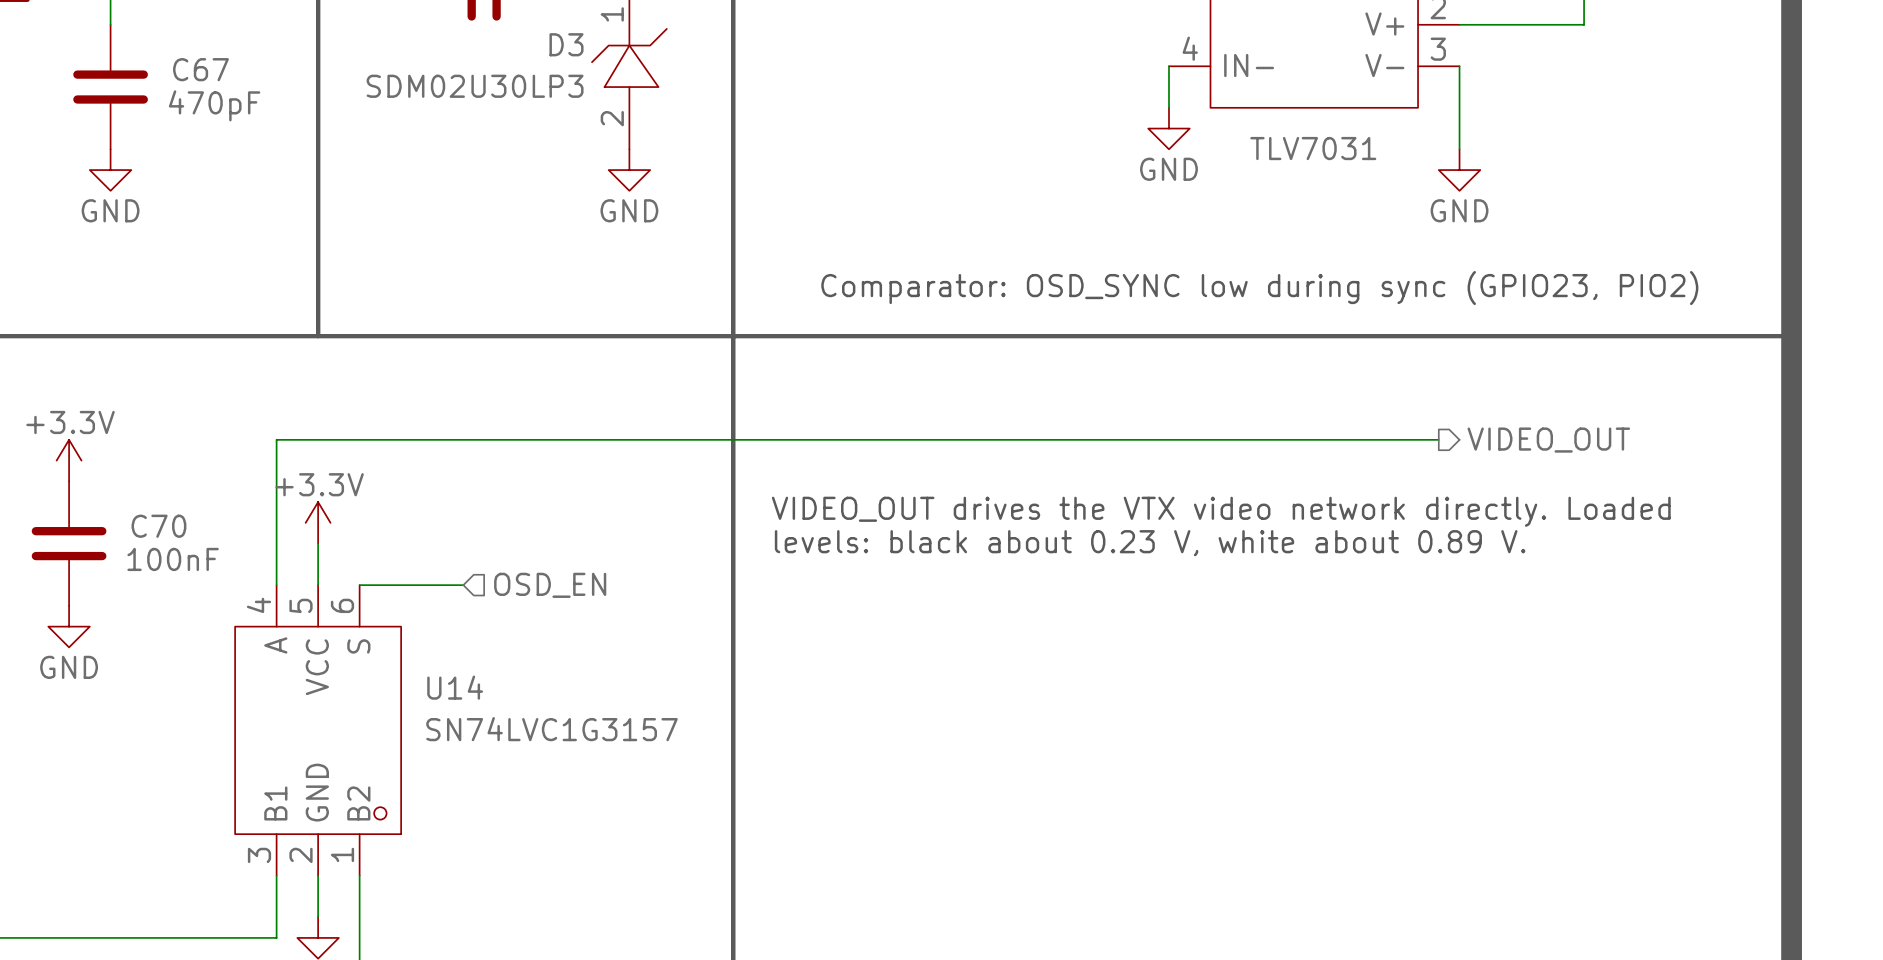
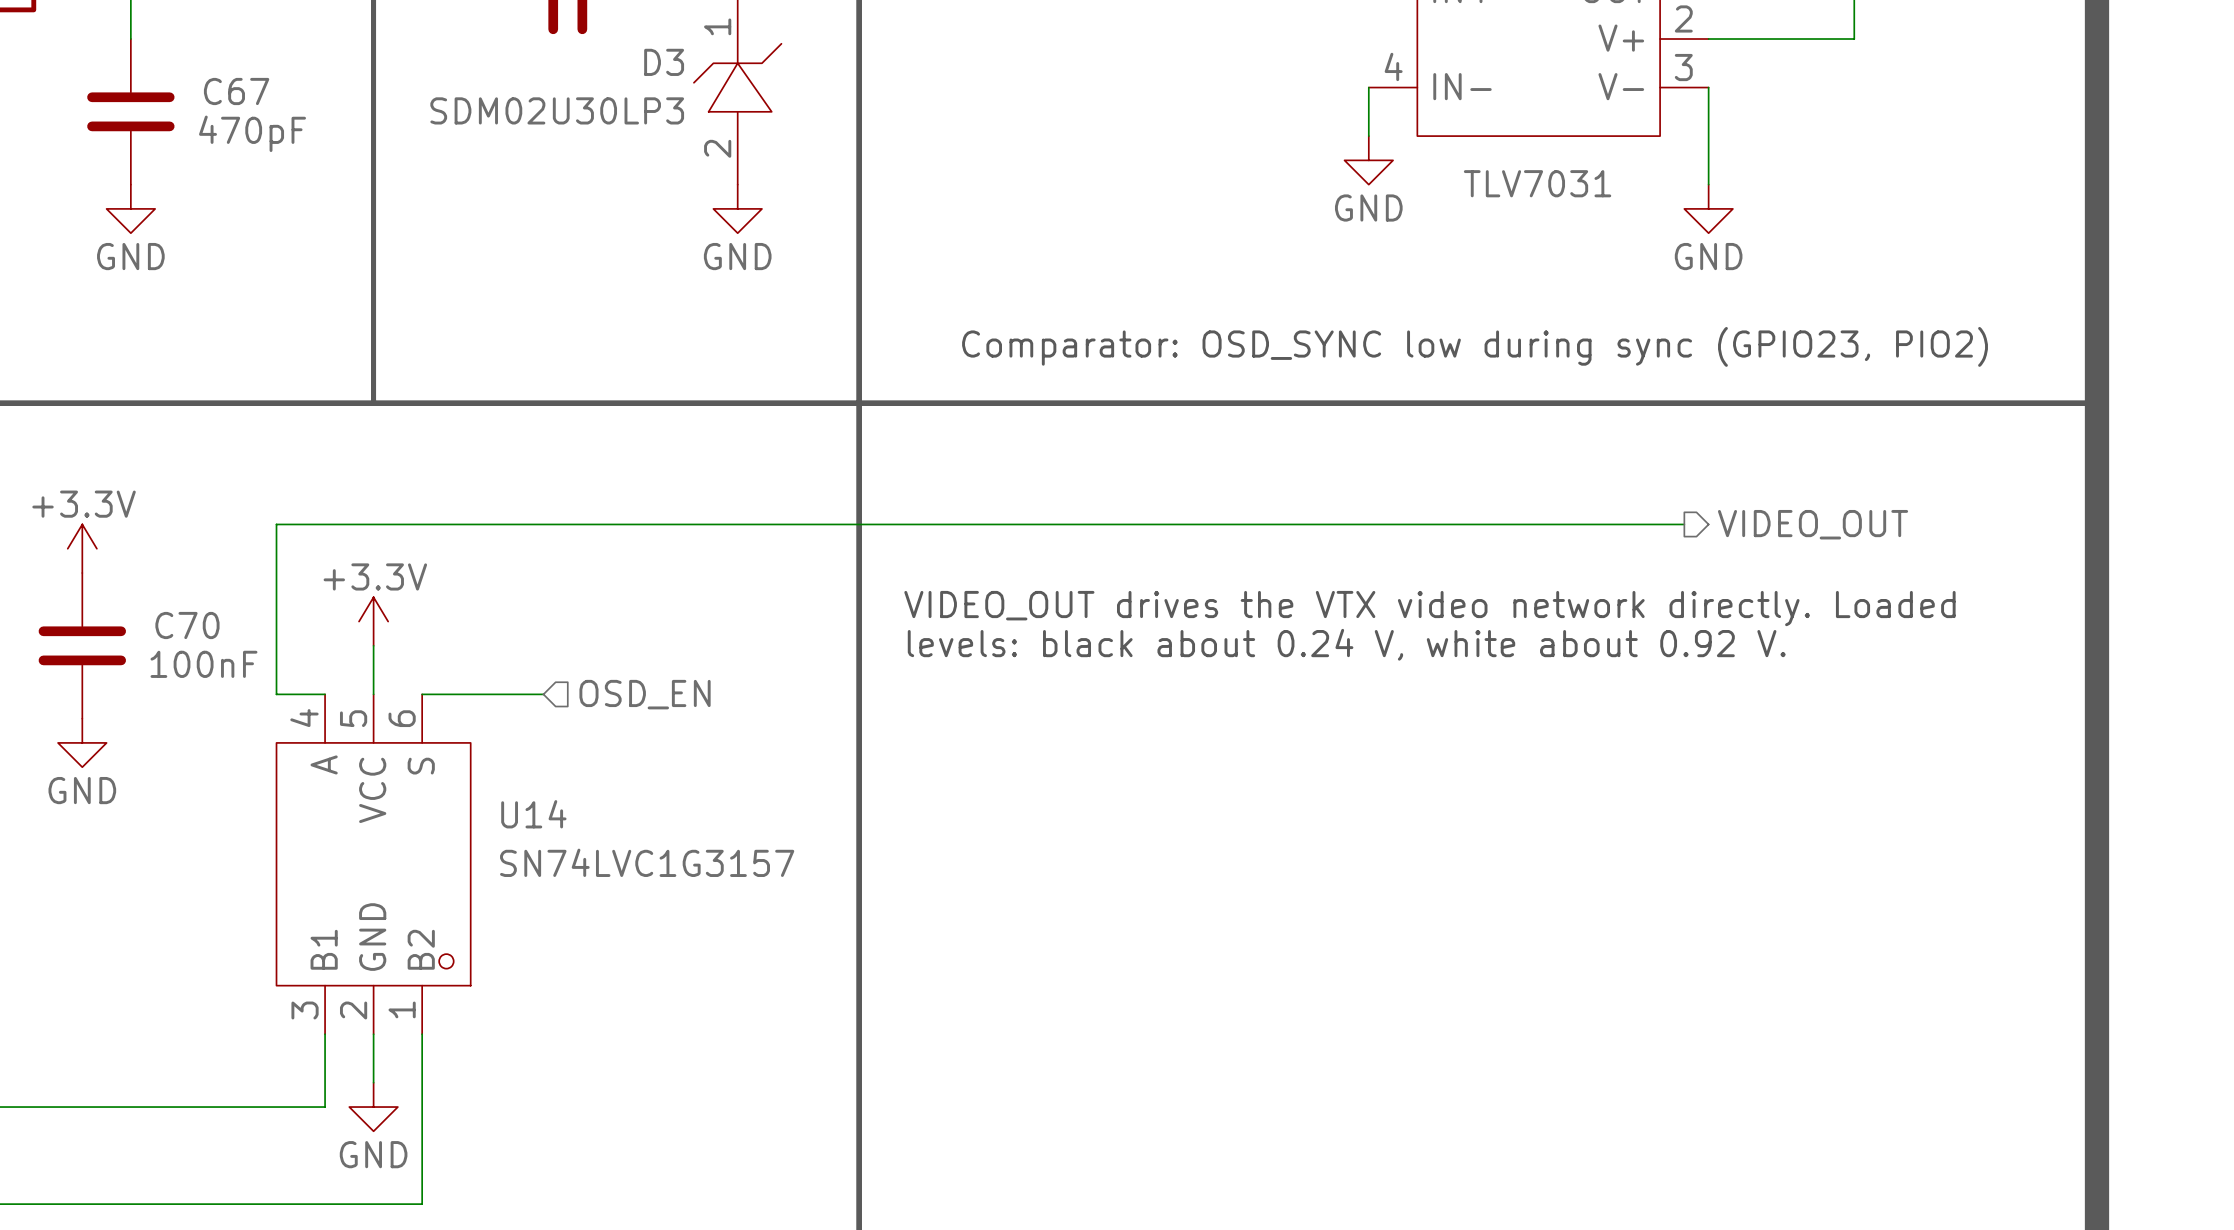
wire: (276, 439) (276, 585) -> (325, 524) (276, 524) (276, 694) (325, 694)
text: levels: black about 0.23 V, white about 0.89 V. (1150, 543) -> levels: black about 0.24 V, white about 0.92 V. (1346, 644)

